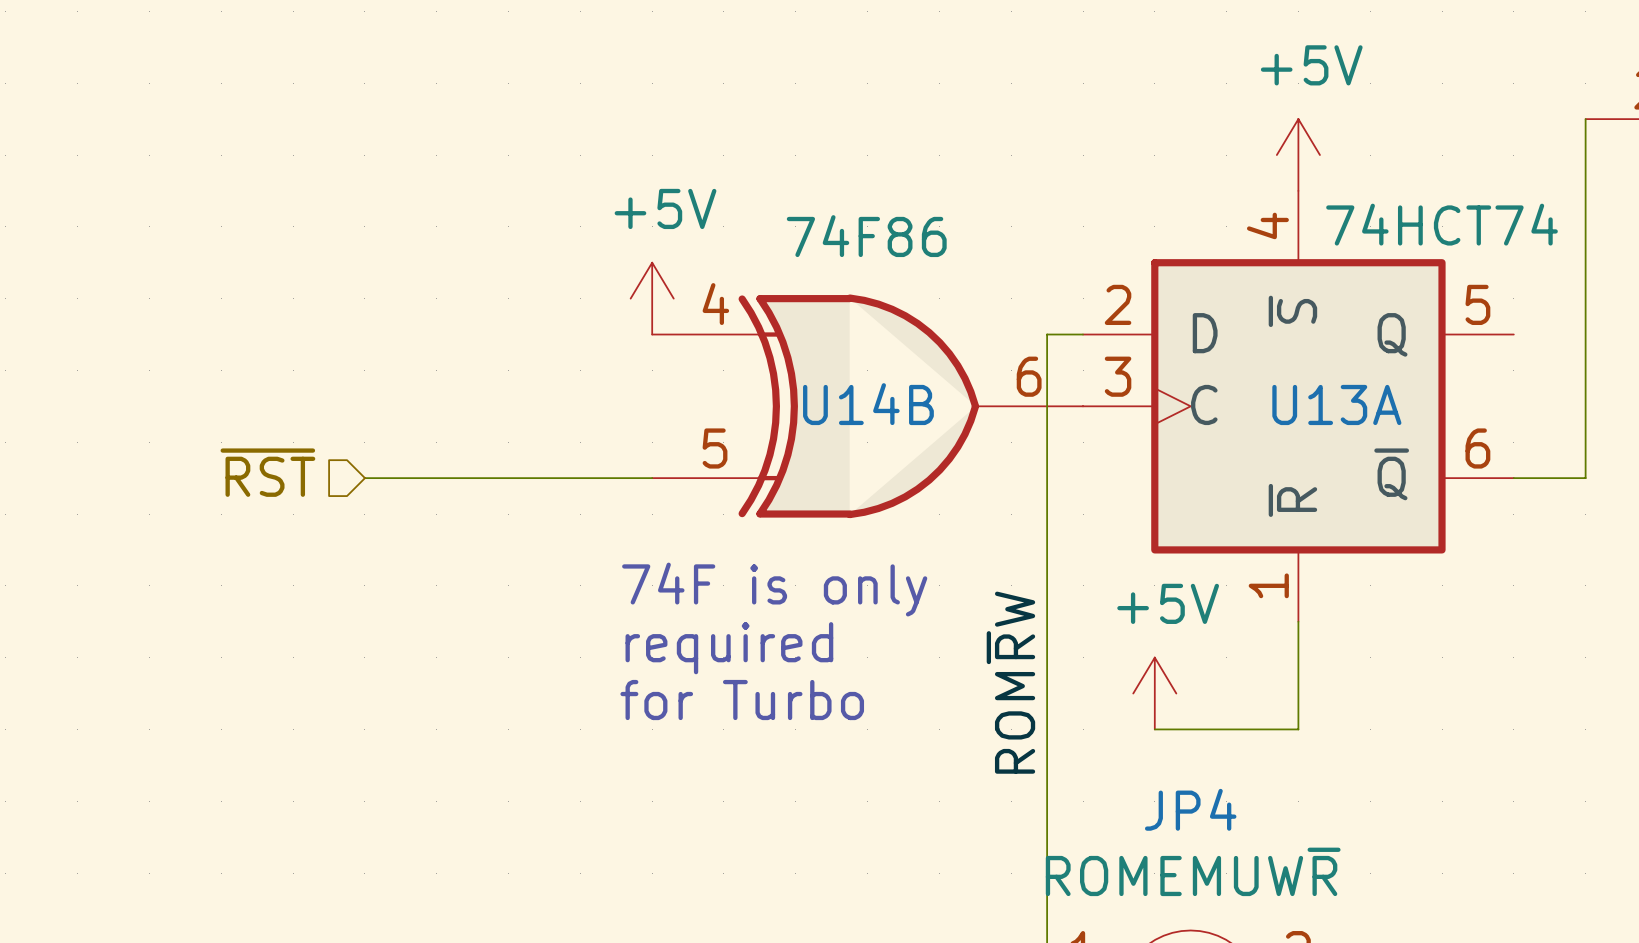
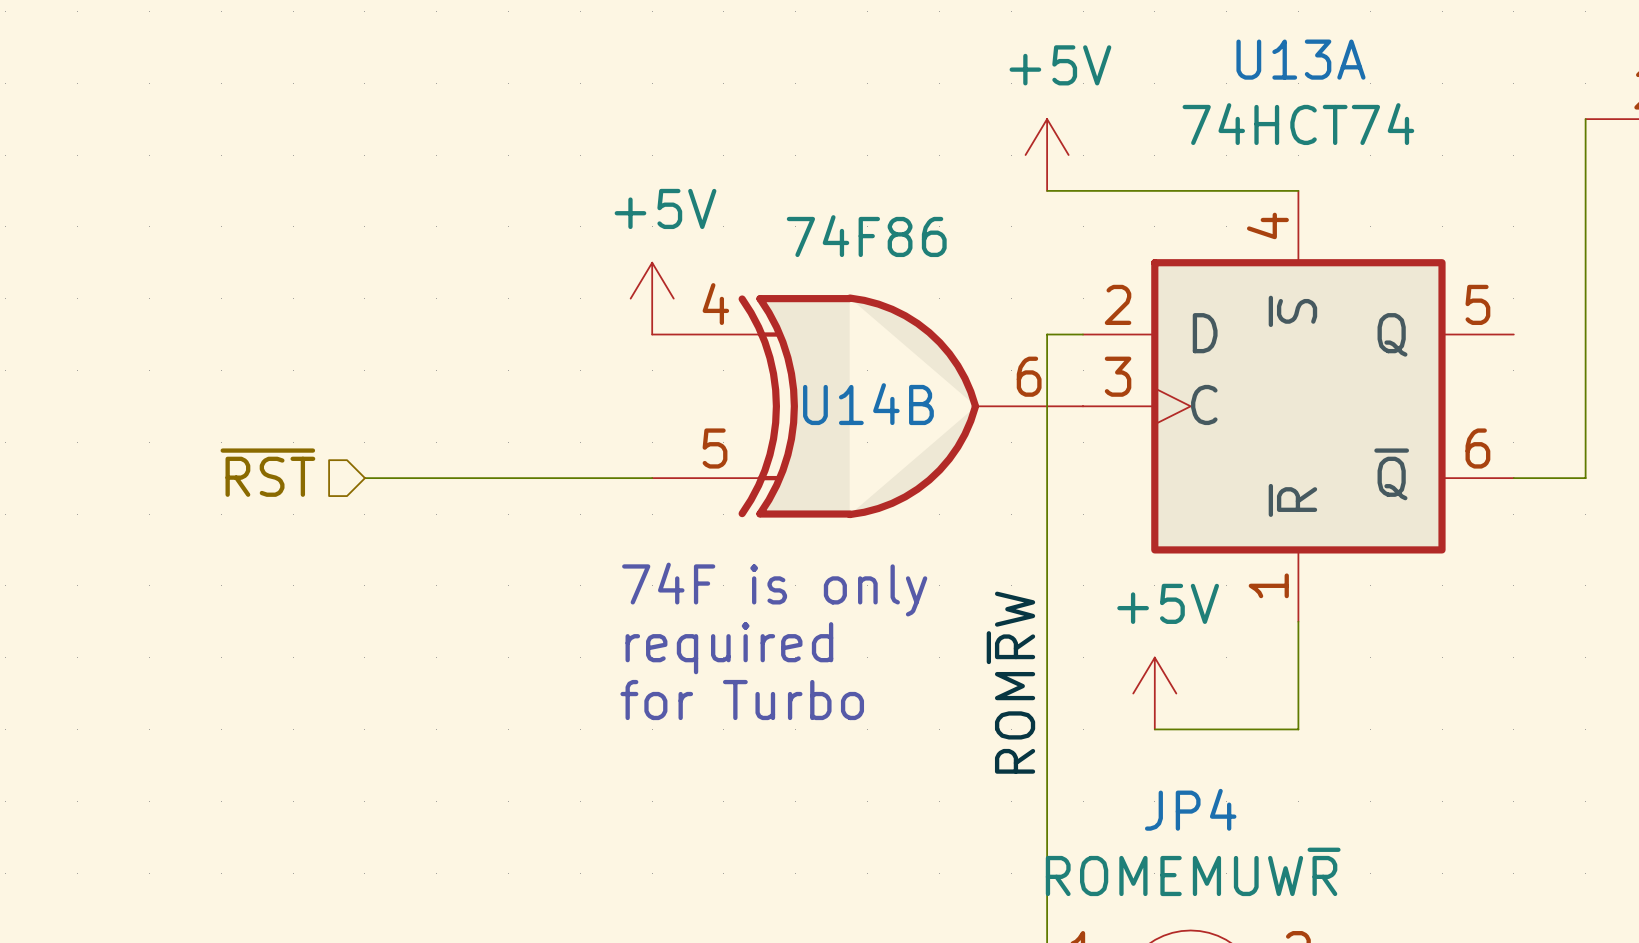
power symbol position: +5V (1298, 155) -> +5V (1047, 155)
wire: none -> (1047, 190) (1298, 190)
U13A value position: 74HCT74 (1442, 224) -> 74HCT74 (1298, 124)
U13A name position: U13A (1336, 404) -> U13A (1300, 59)

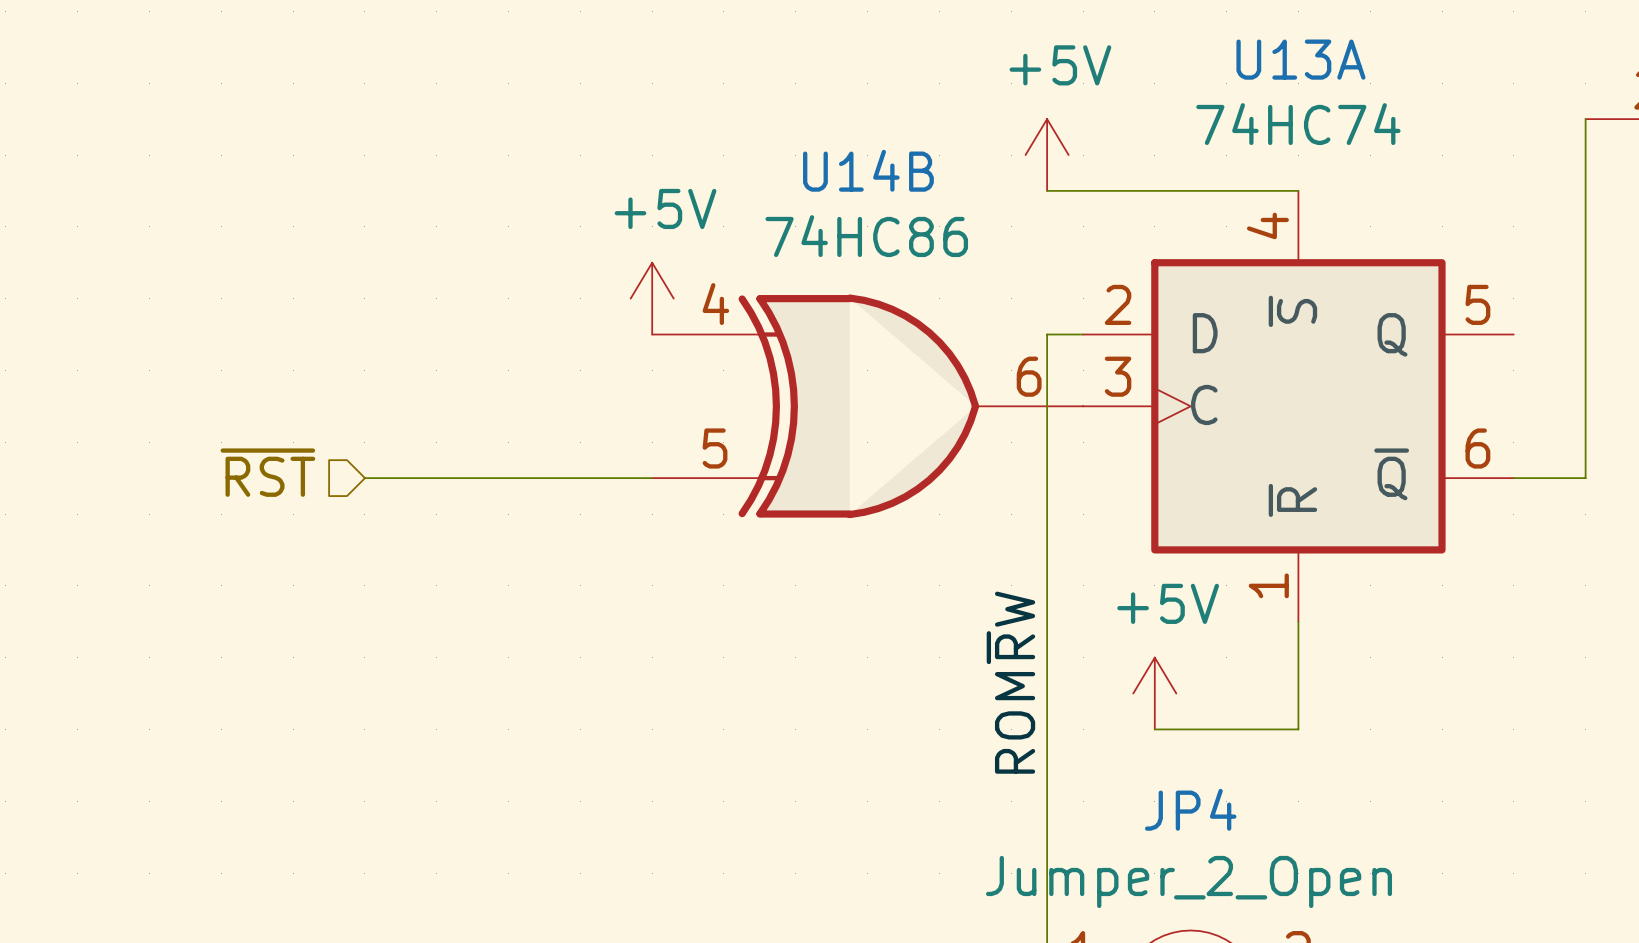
U13A value: 74HCT74 (1298, 124) -> 74HC74 (1298, 124)
U14B value: 74F86 (866, 236) -> 74HC86 (866, 236)
U14B name position: U14B (868, 404) -> U14B (868, 170)
text: 74F is only (774, 589) -> none
text: required (729, 648) -> none
text: for Turbo (742, 700) -> none
JP4 value: ROMEMUW~{R} (1193, 871) -> Jumper_2_Open (1188, 881)

